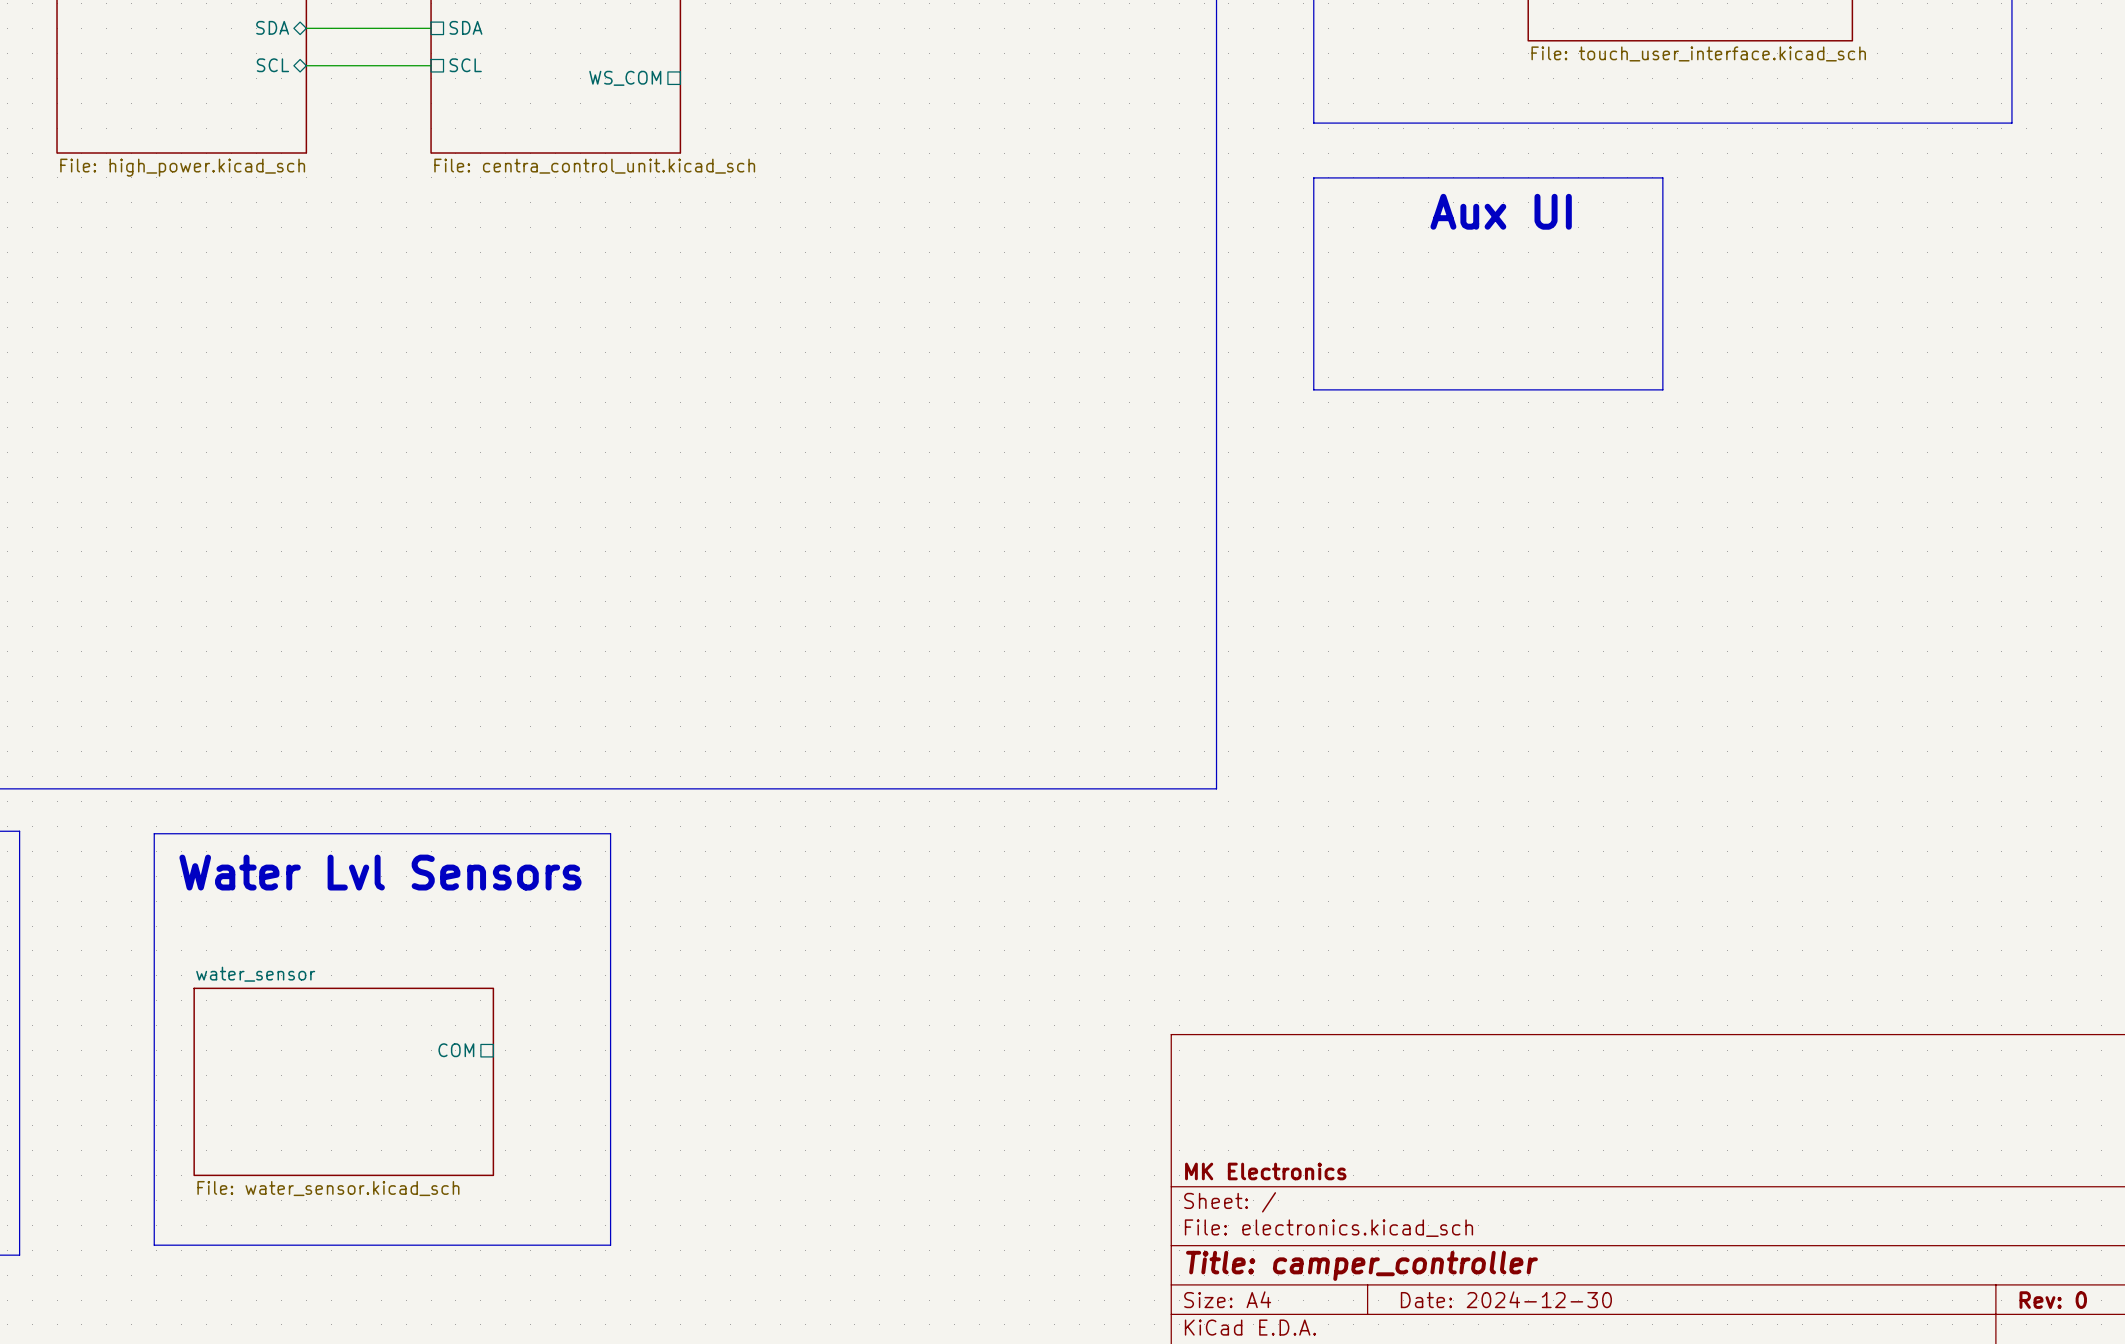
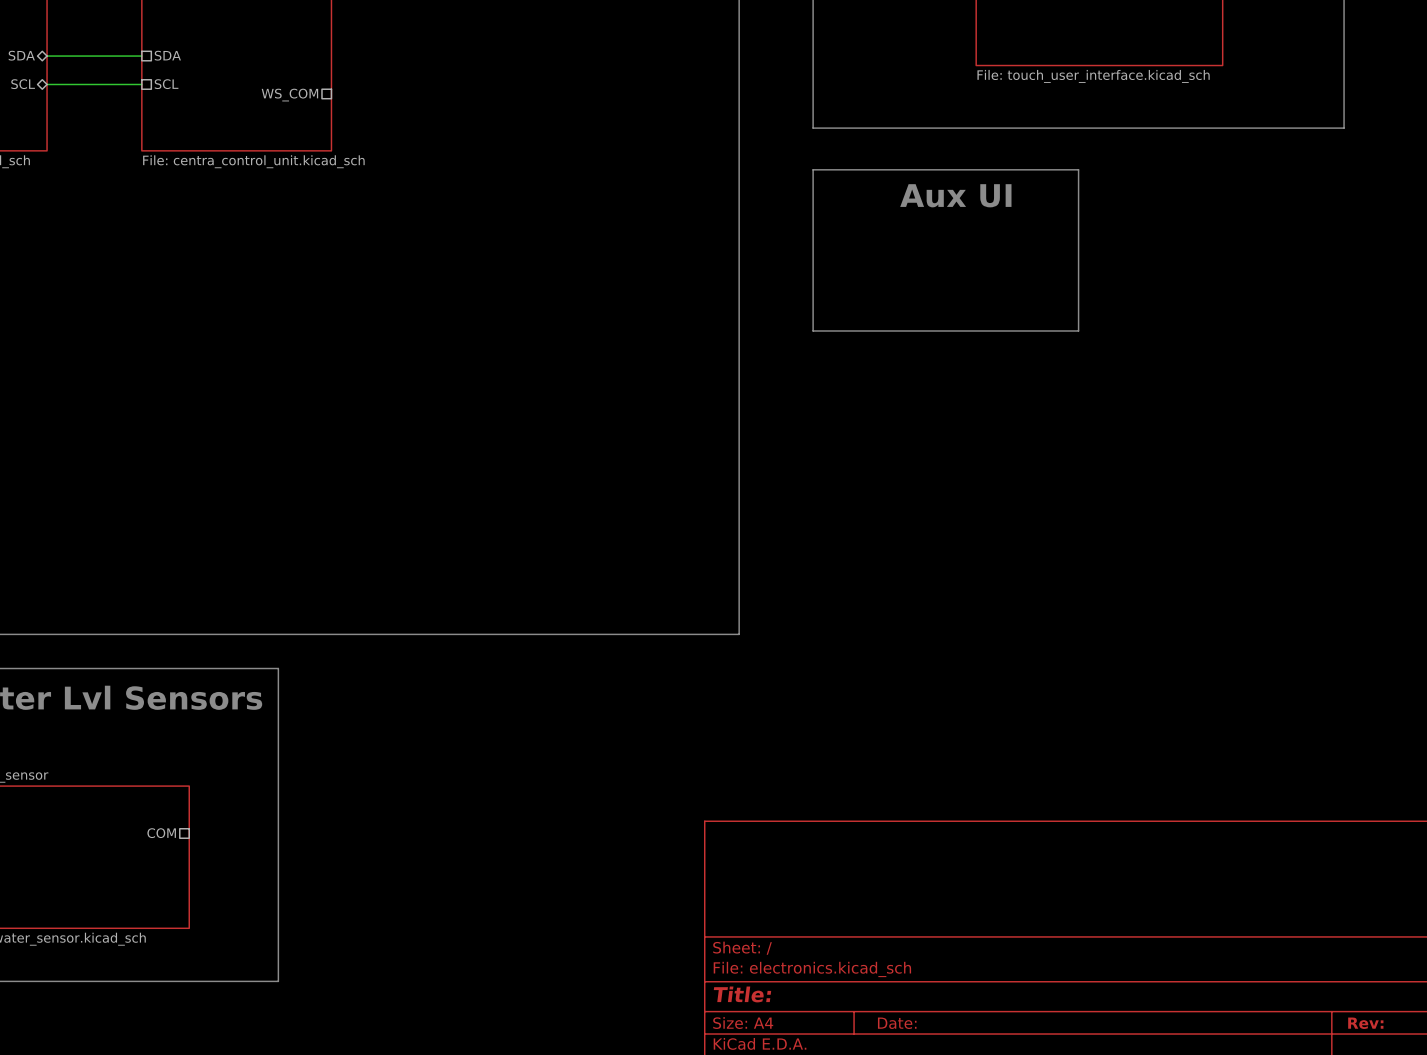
title block: MK Electronics (1265, 1171) -> none
title block: Title: camper_controller (1361, 1265) -> Title: (742, 994)
title block: Date: 2024-12-30 (1506, 1299) -> Date: (897, 1023)
title block: Rev: 0 (2053, 1300) -> Rev: (1365, 1023)

